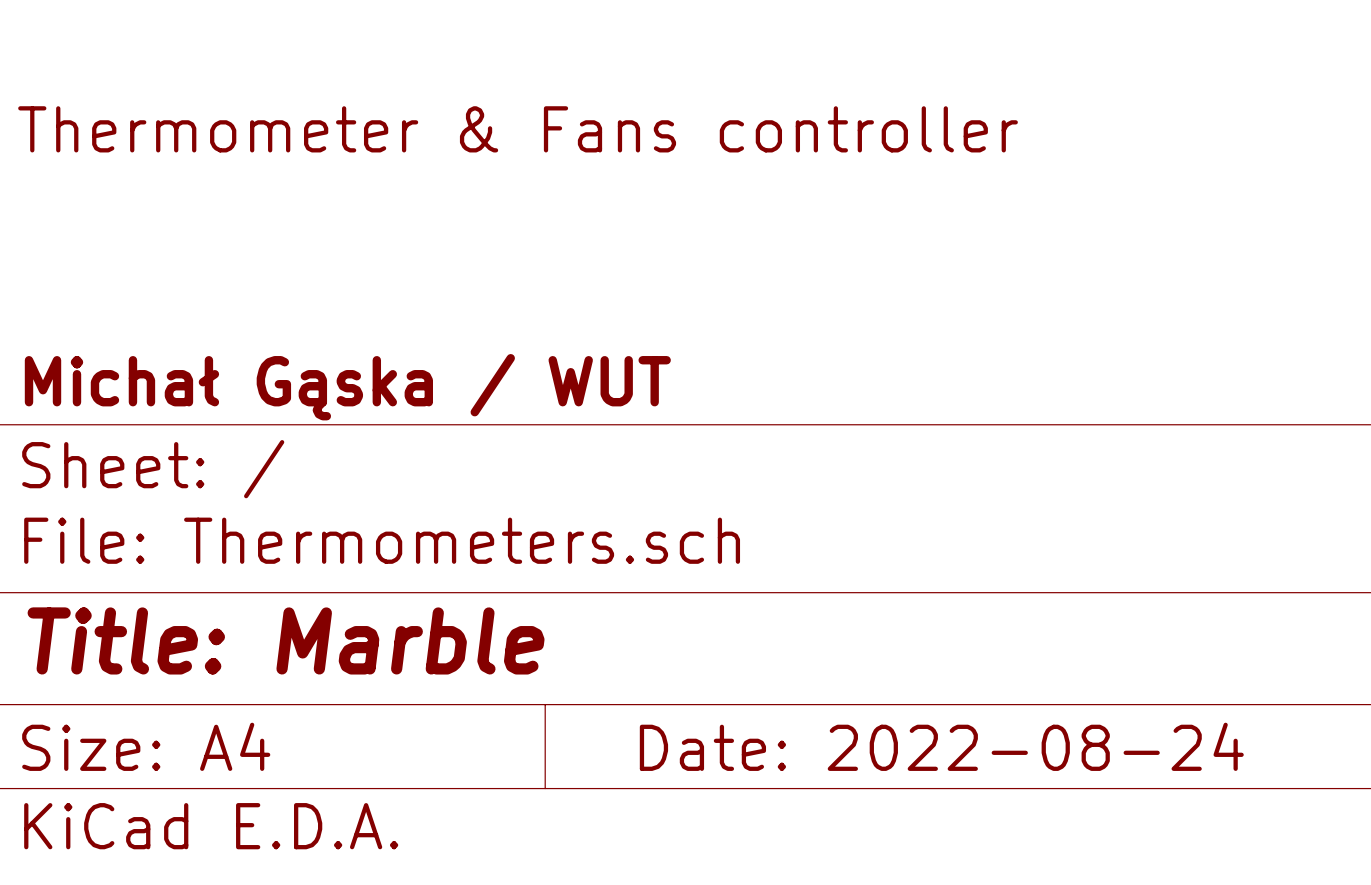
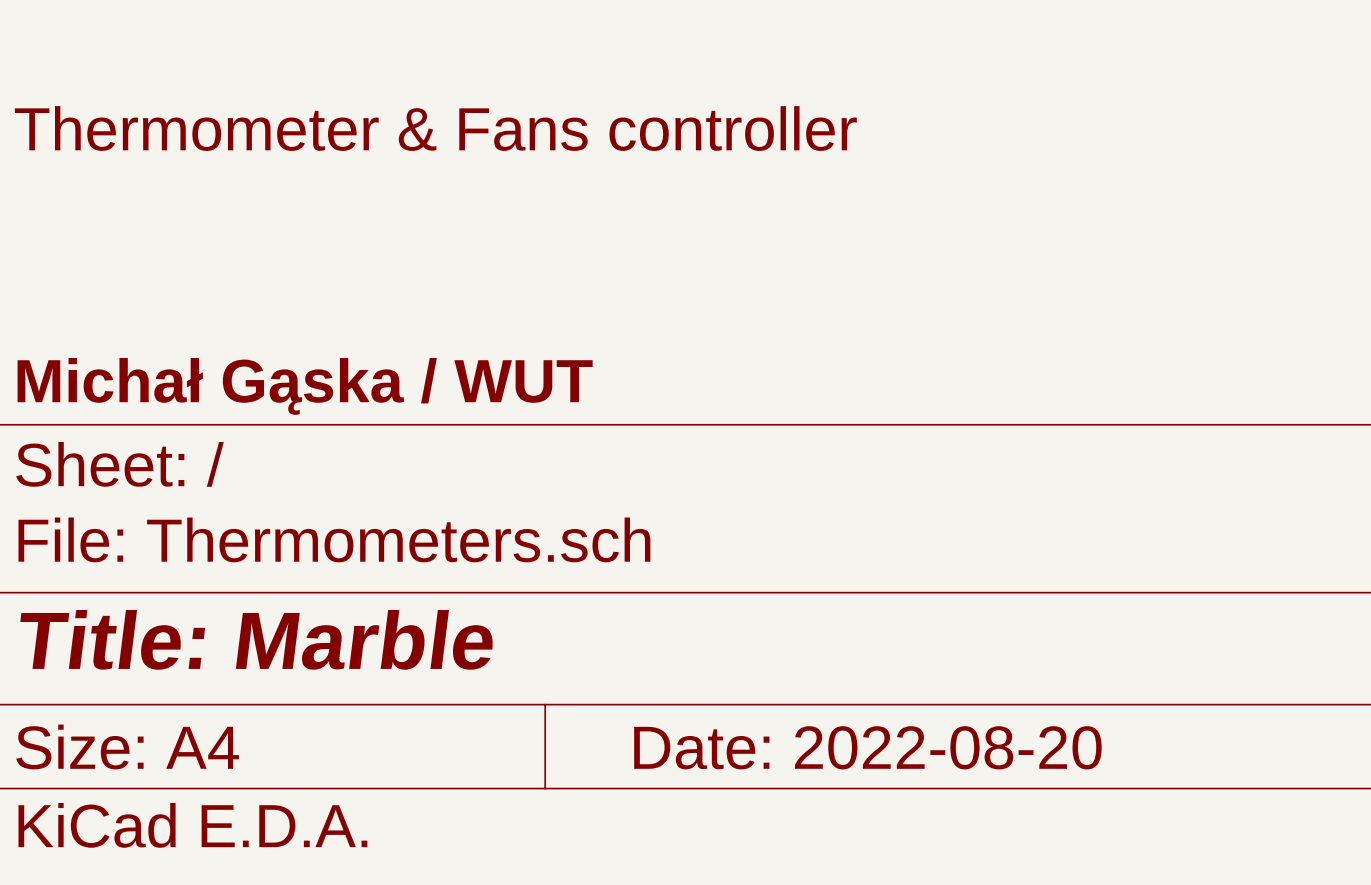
title block: Date: 2022-08-24 (941, 746) -> Date: 2022-08-20 (867, 747)

